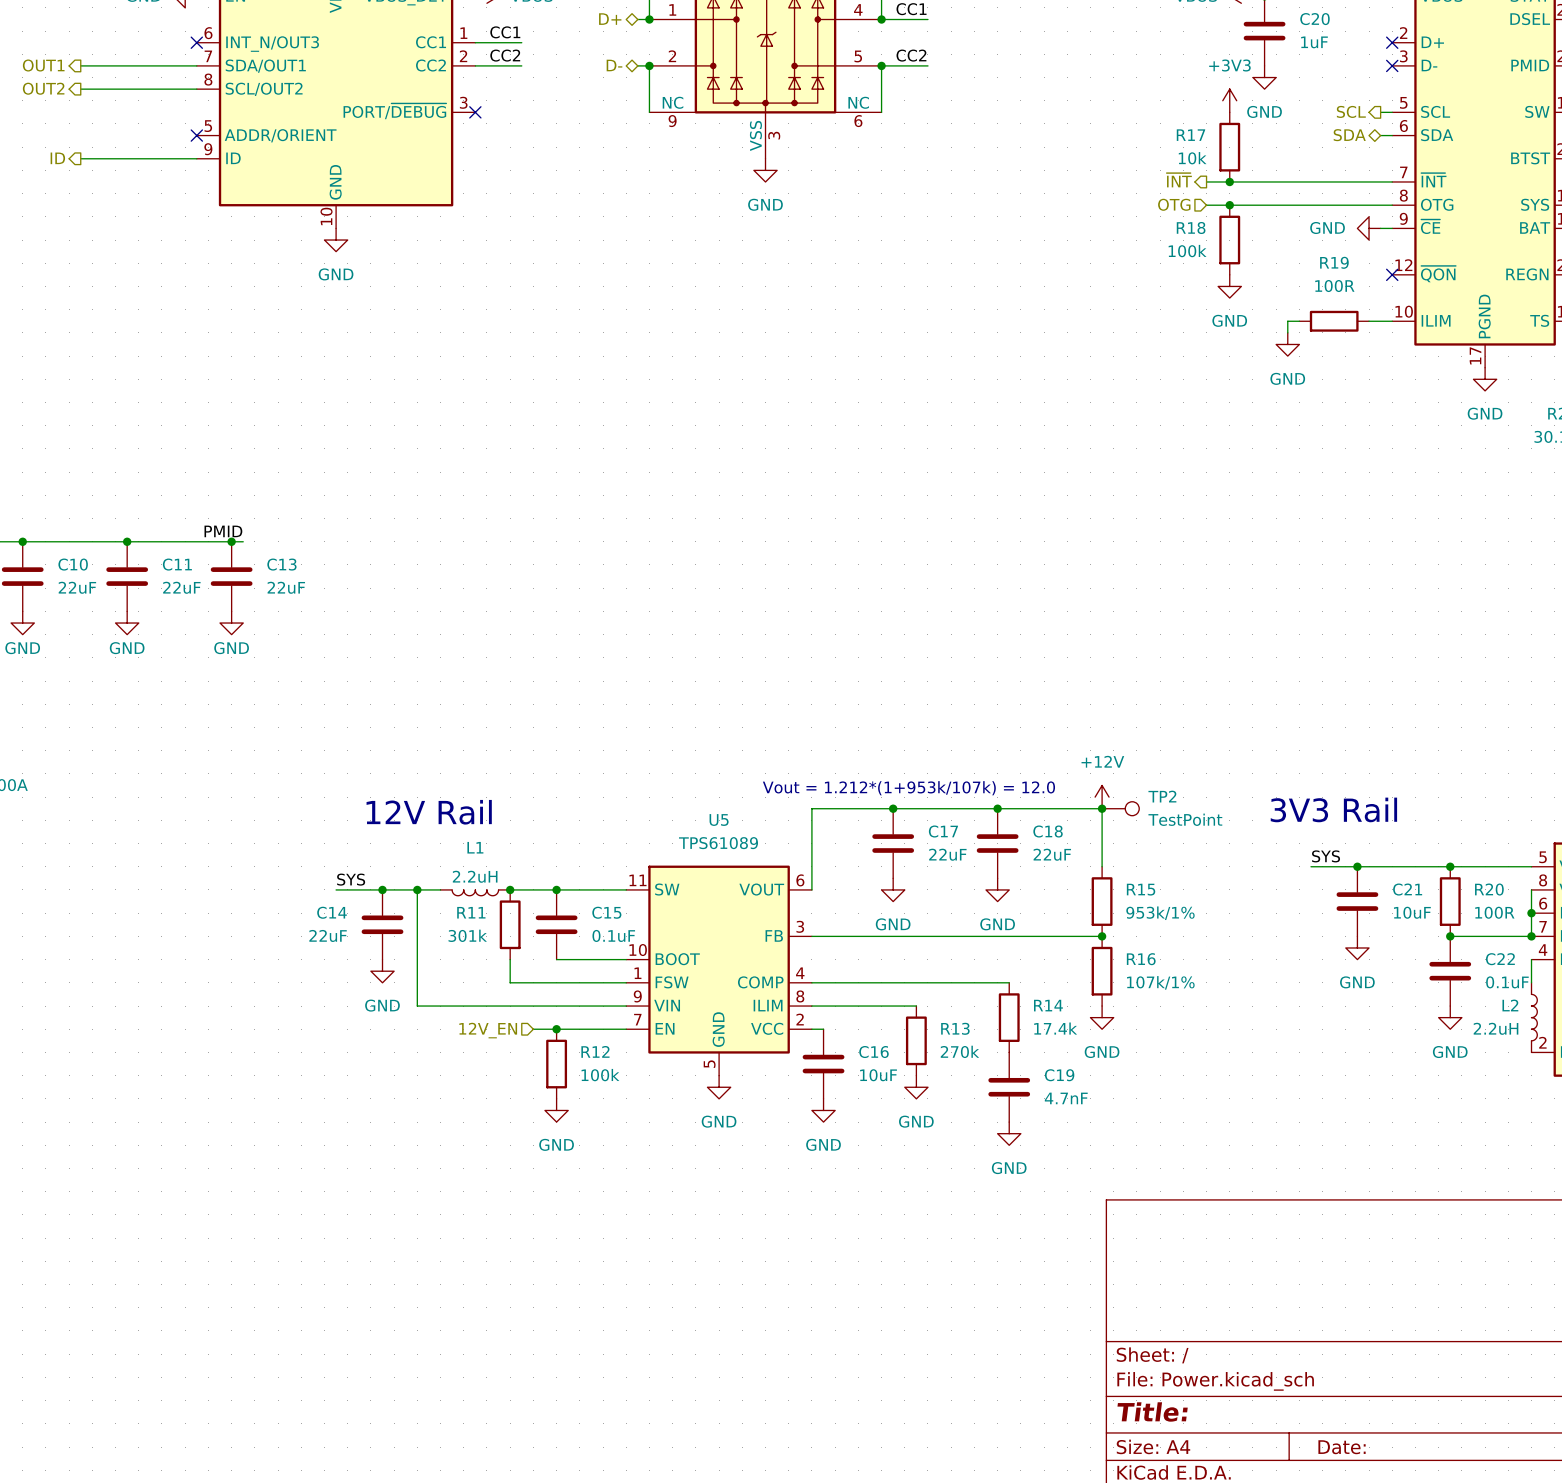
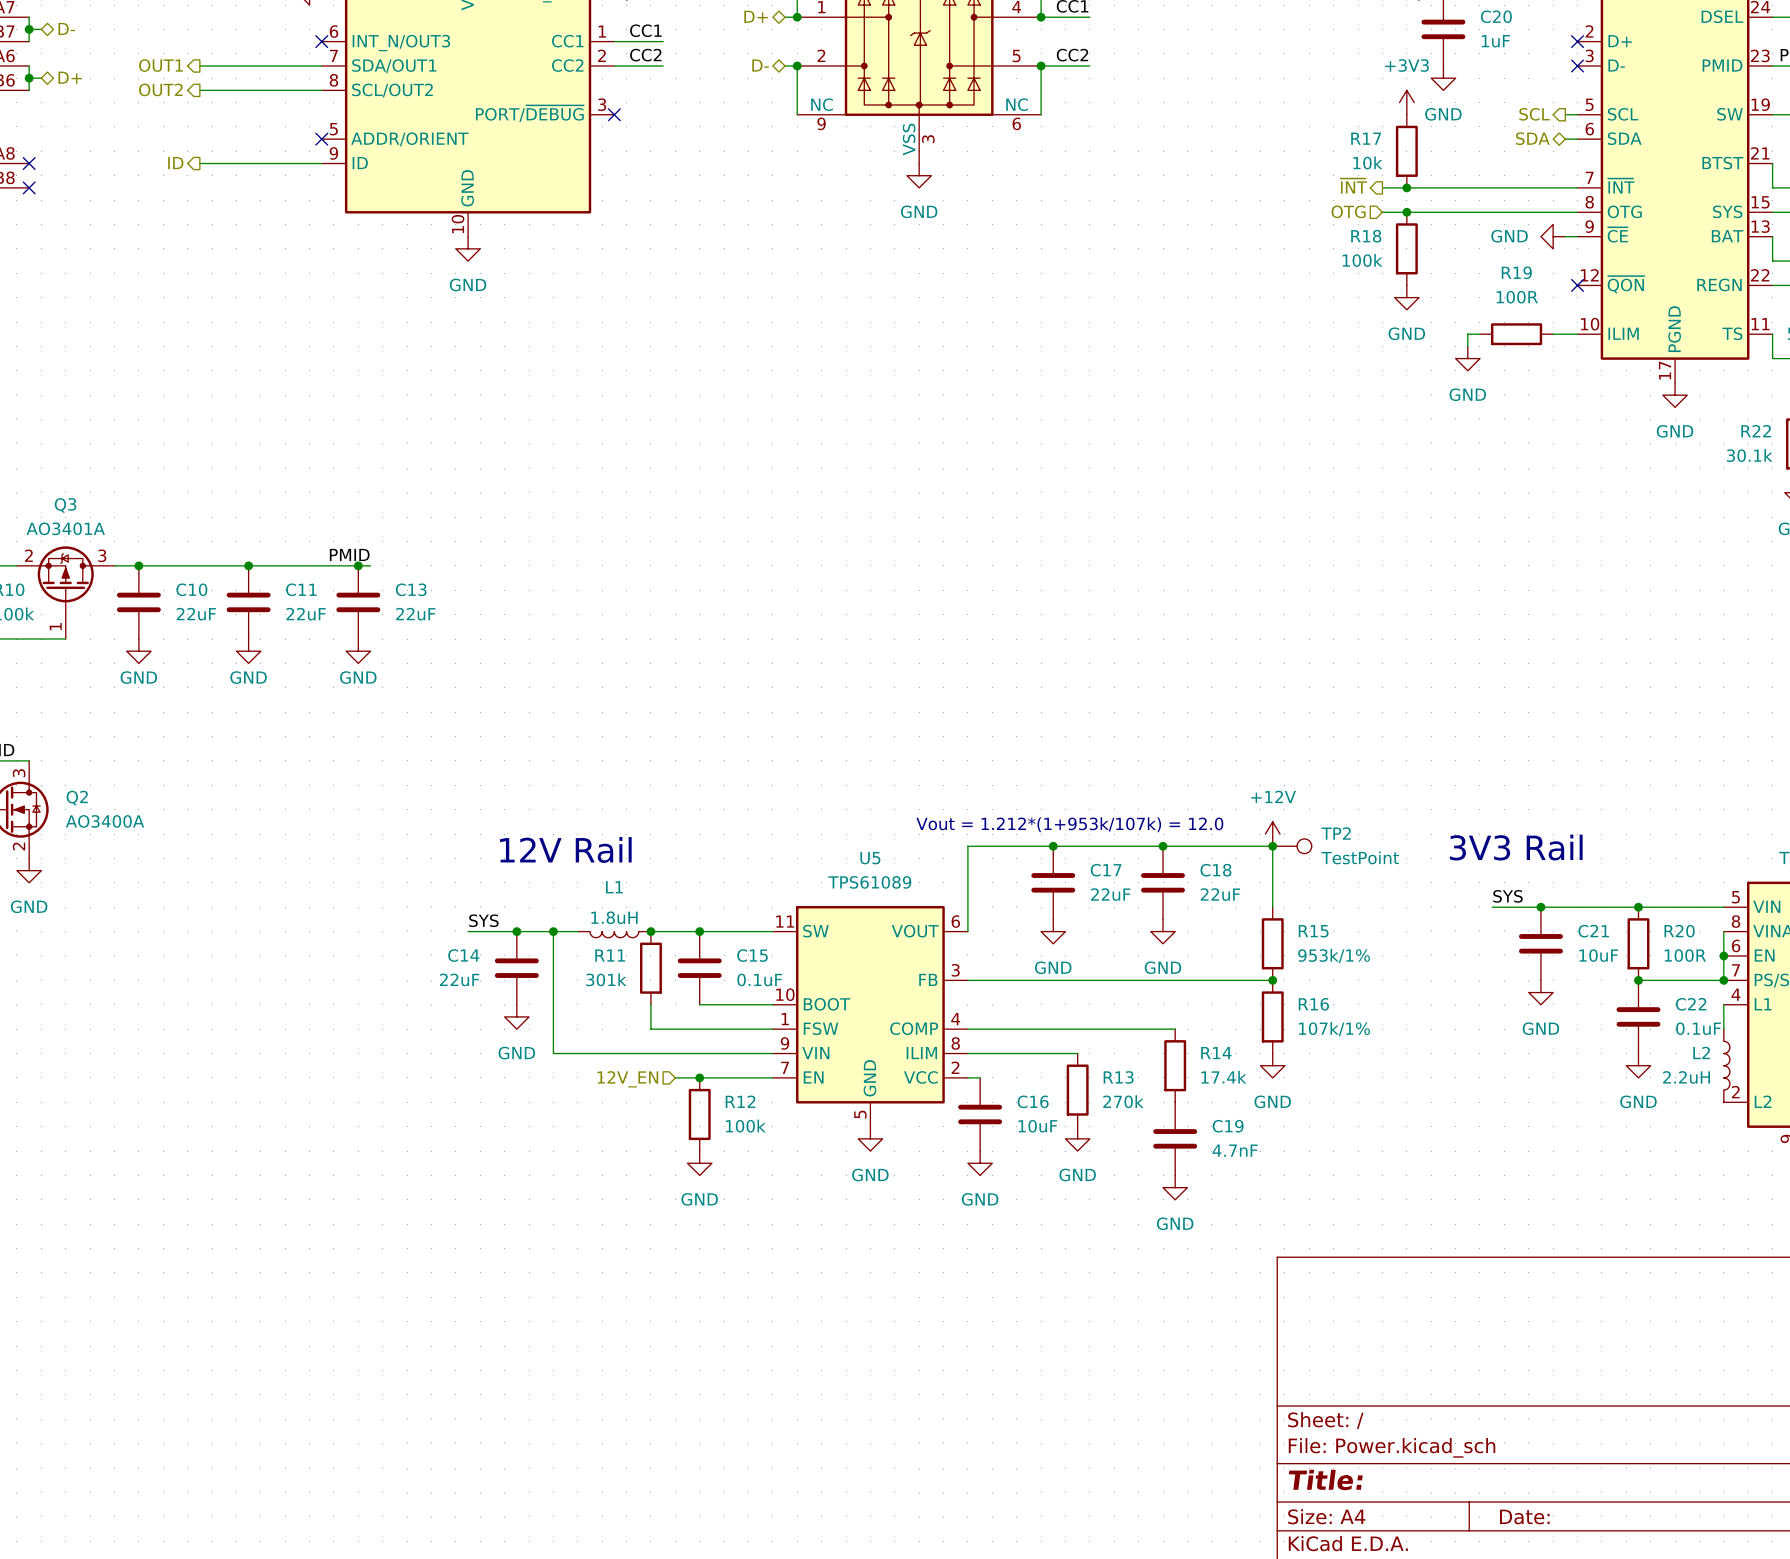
L1 value: 2.2uH (475, 876) -> 1.8uH (614, 917)

